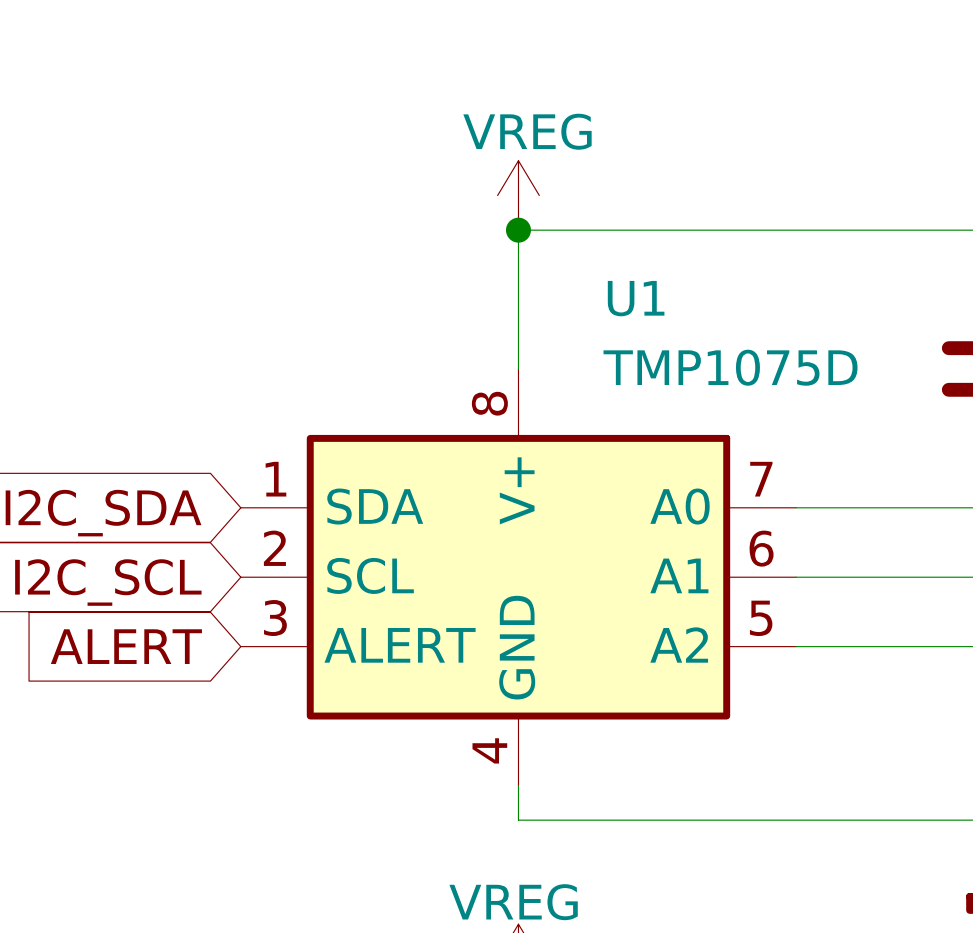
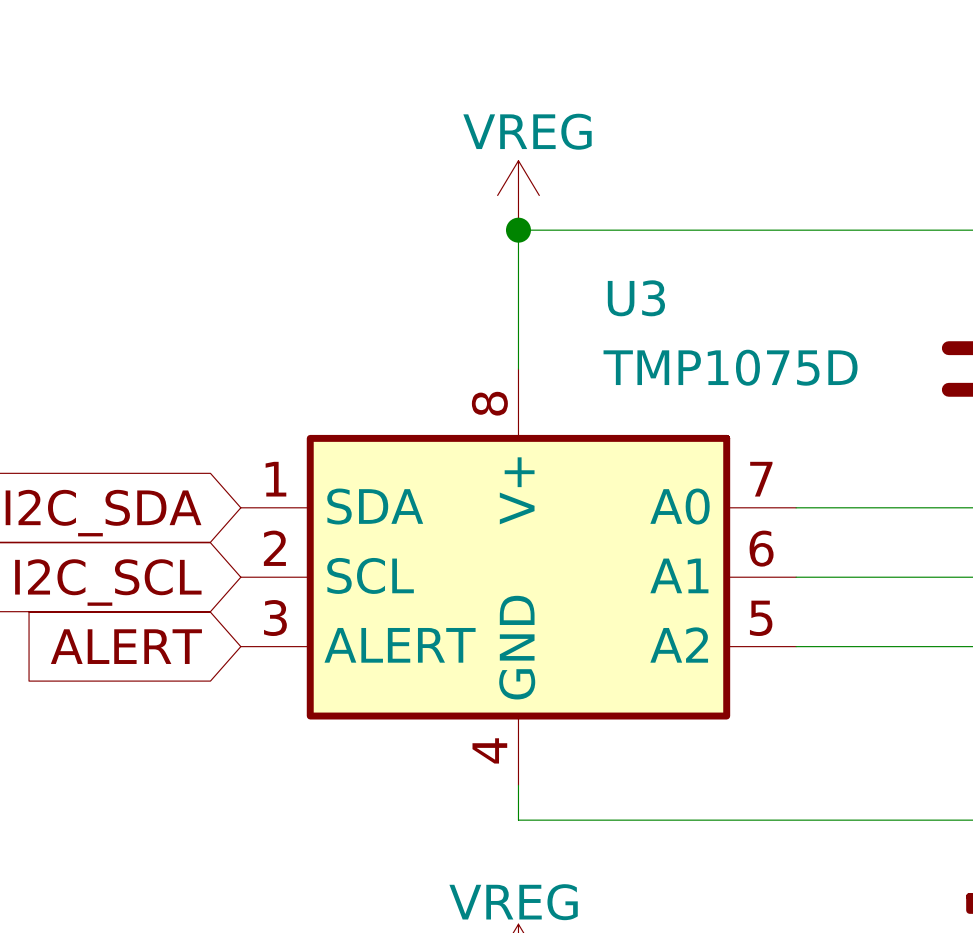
U1 name: U1 (636, 298) -> U3 (636, 298)

